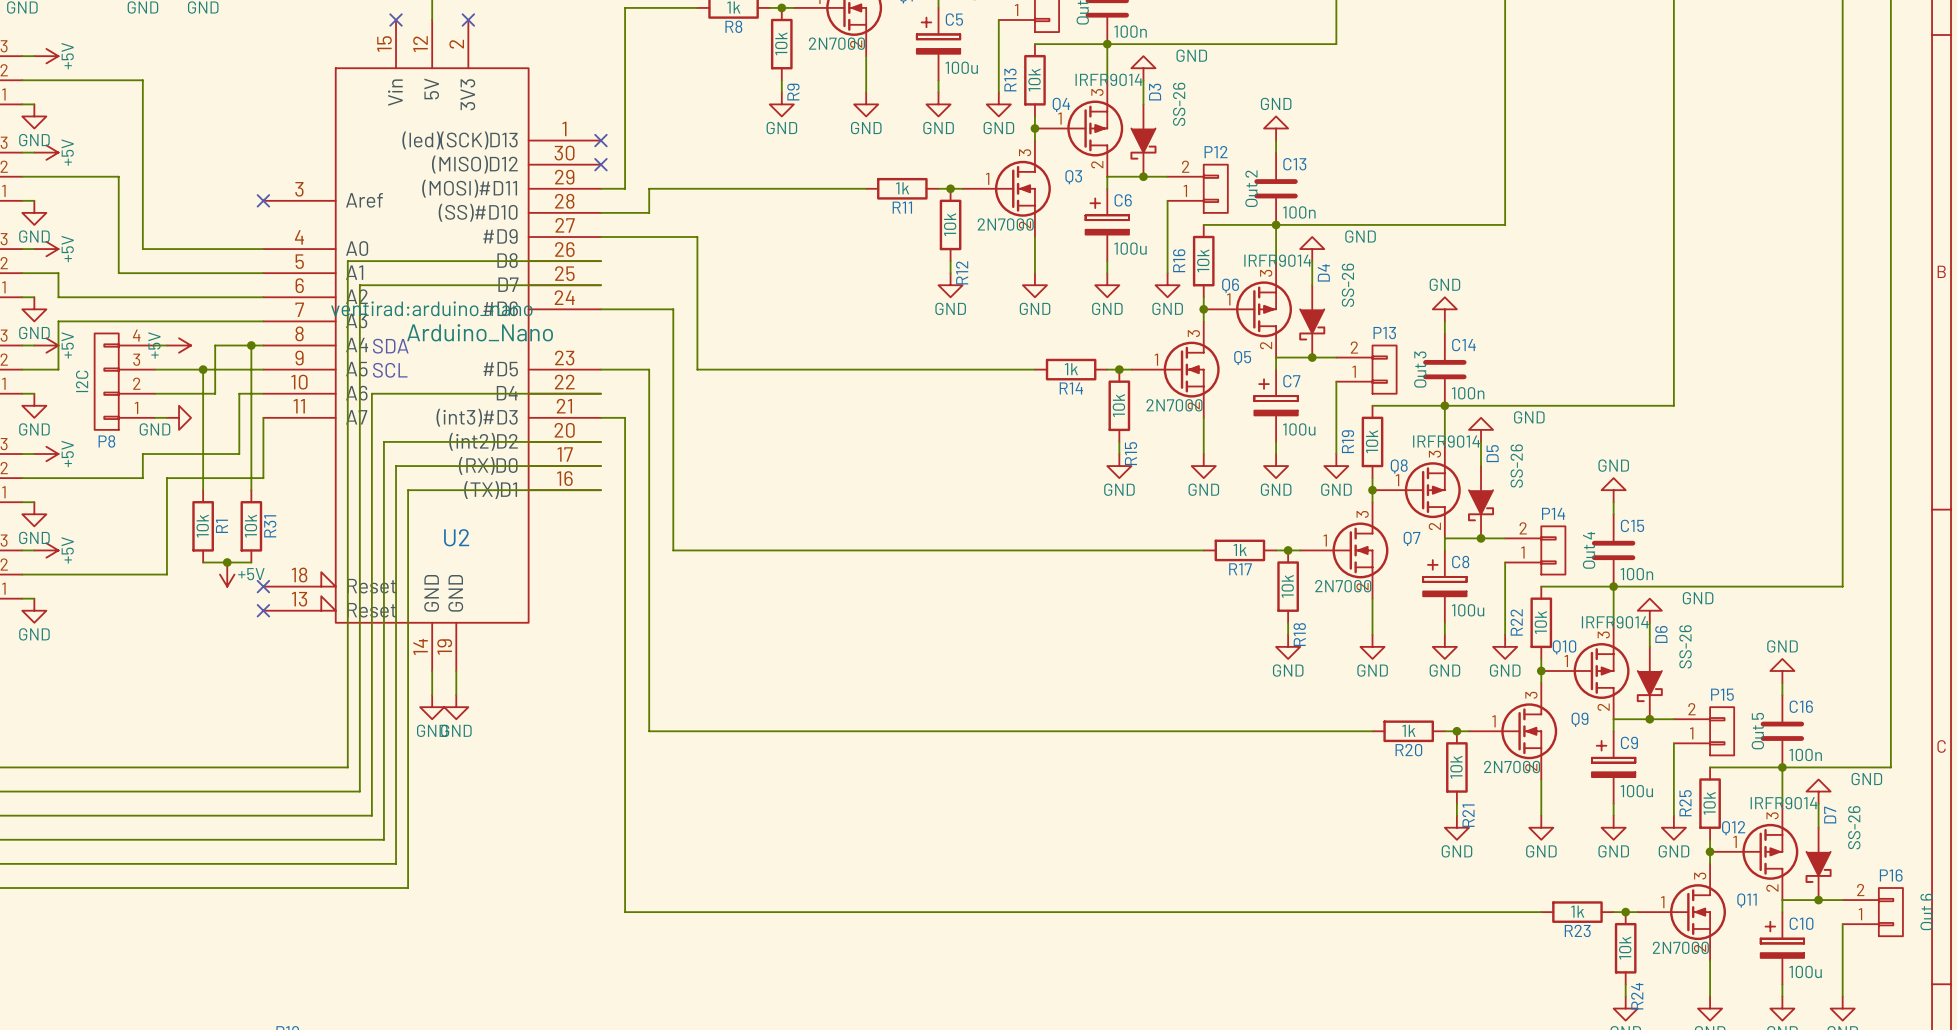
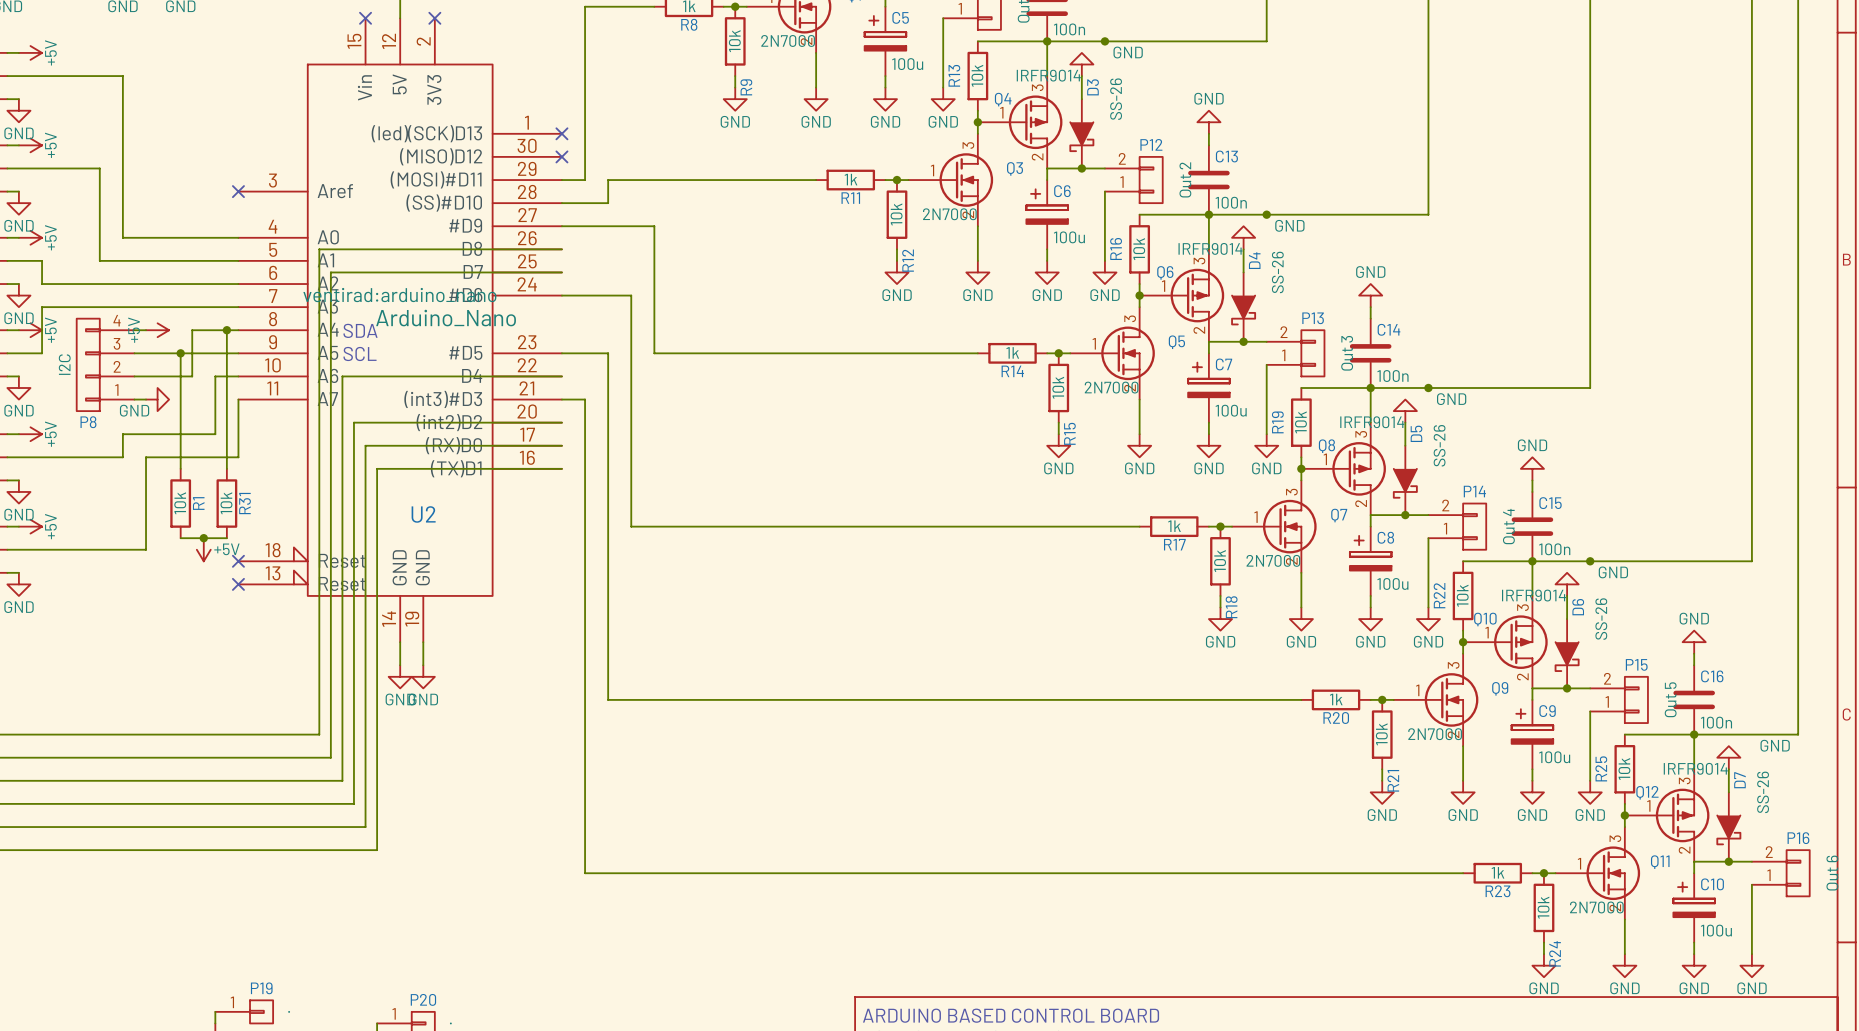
junction: none -> (1104, 41)
junction: none -> (1266, 214)
junction: none -> (1428, 387)
junction: none -> (1590, 561)

